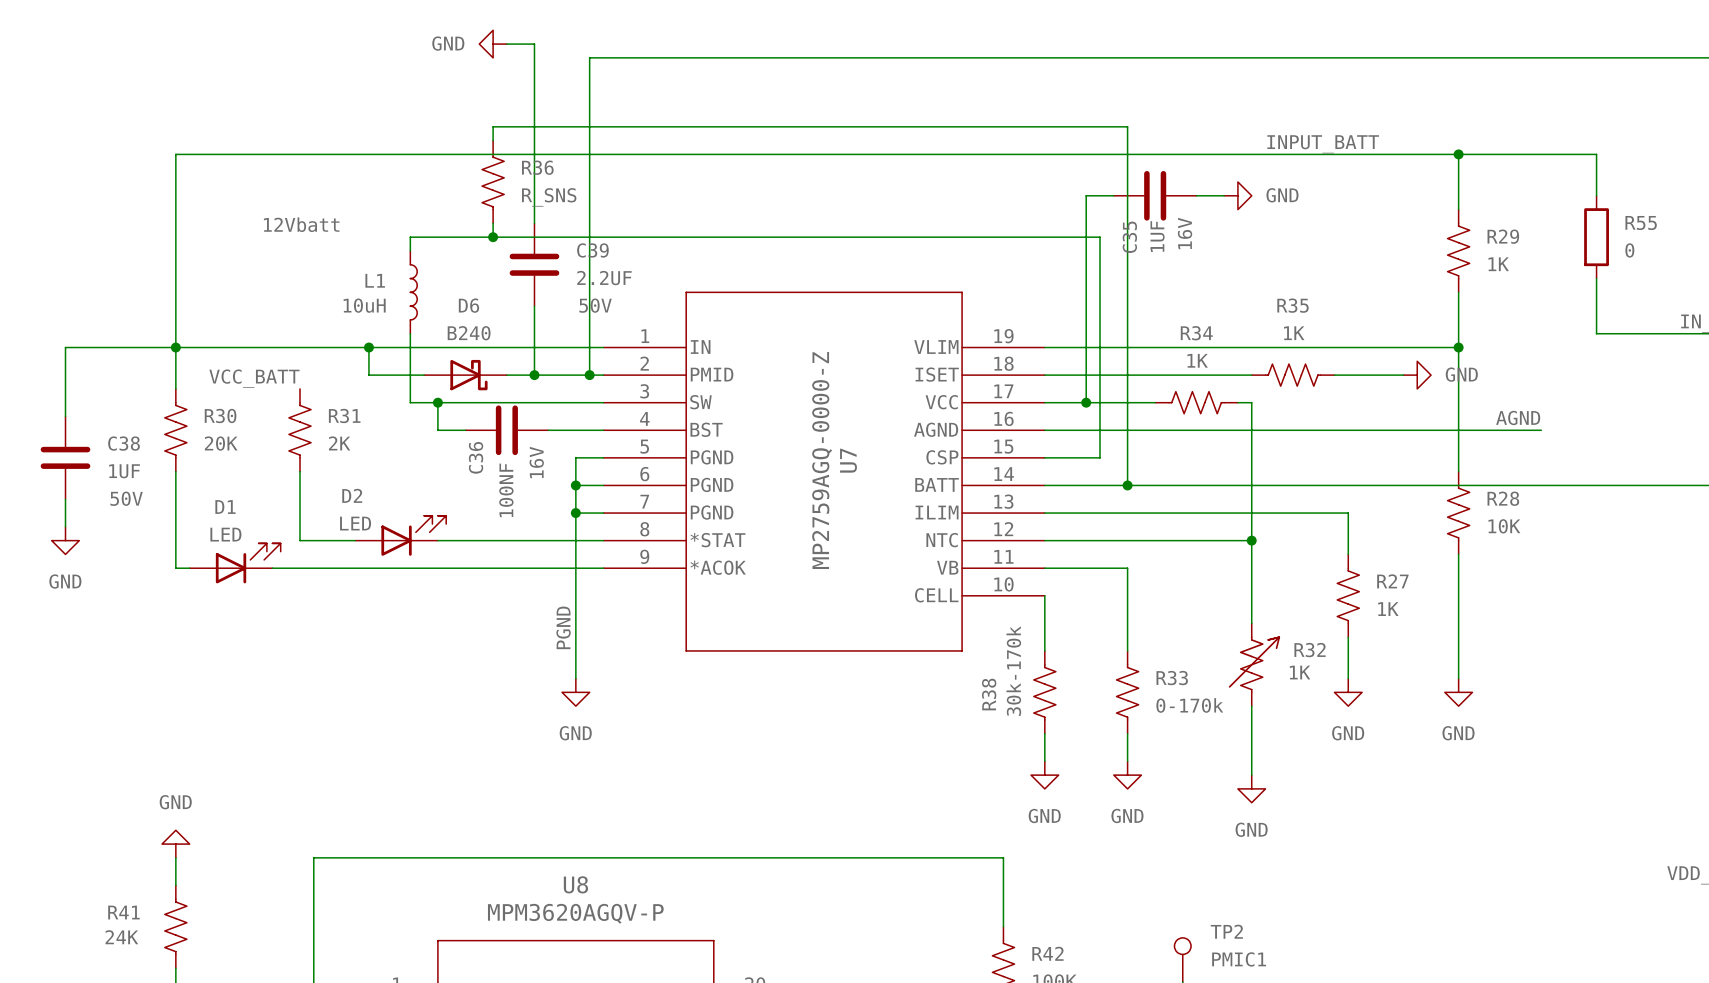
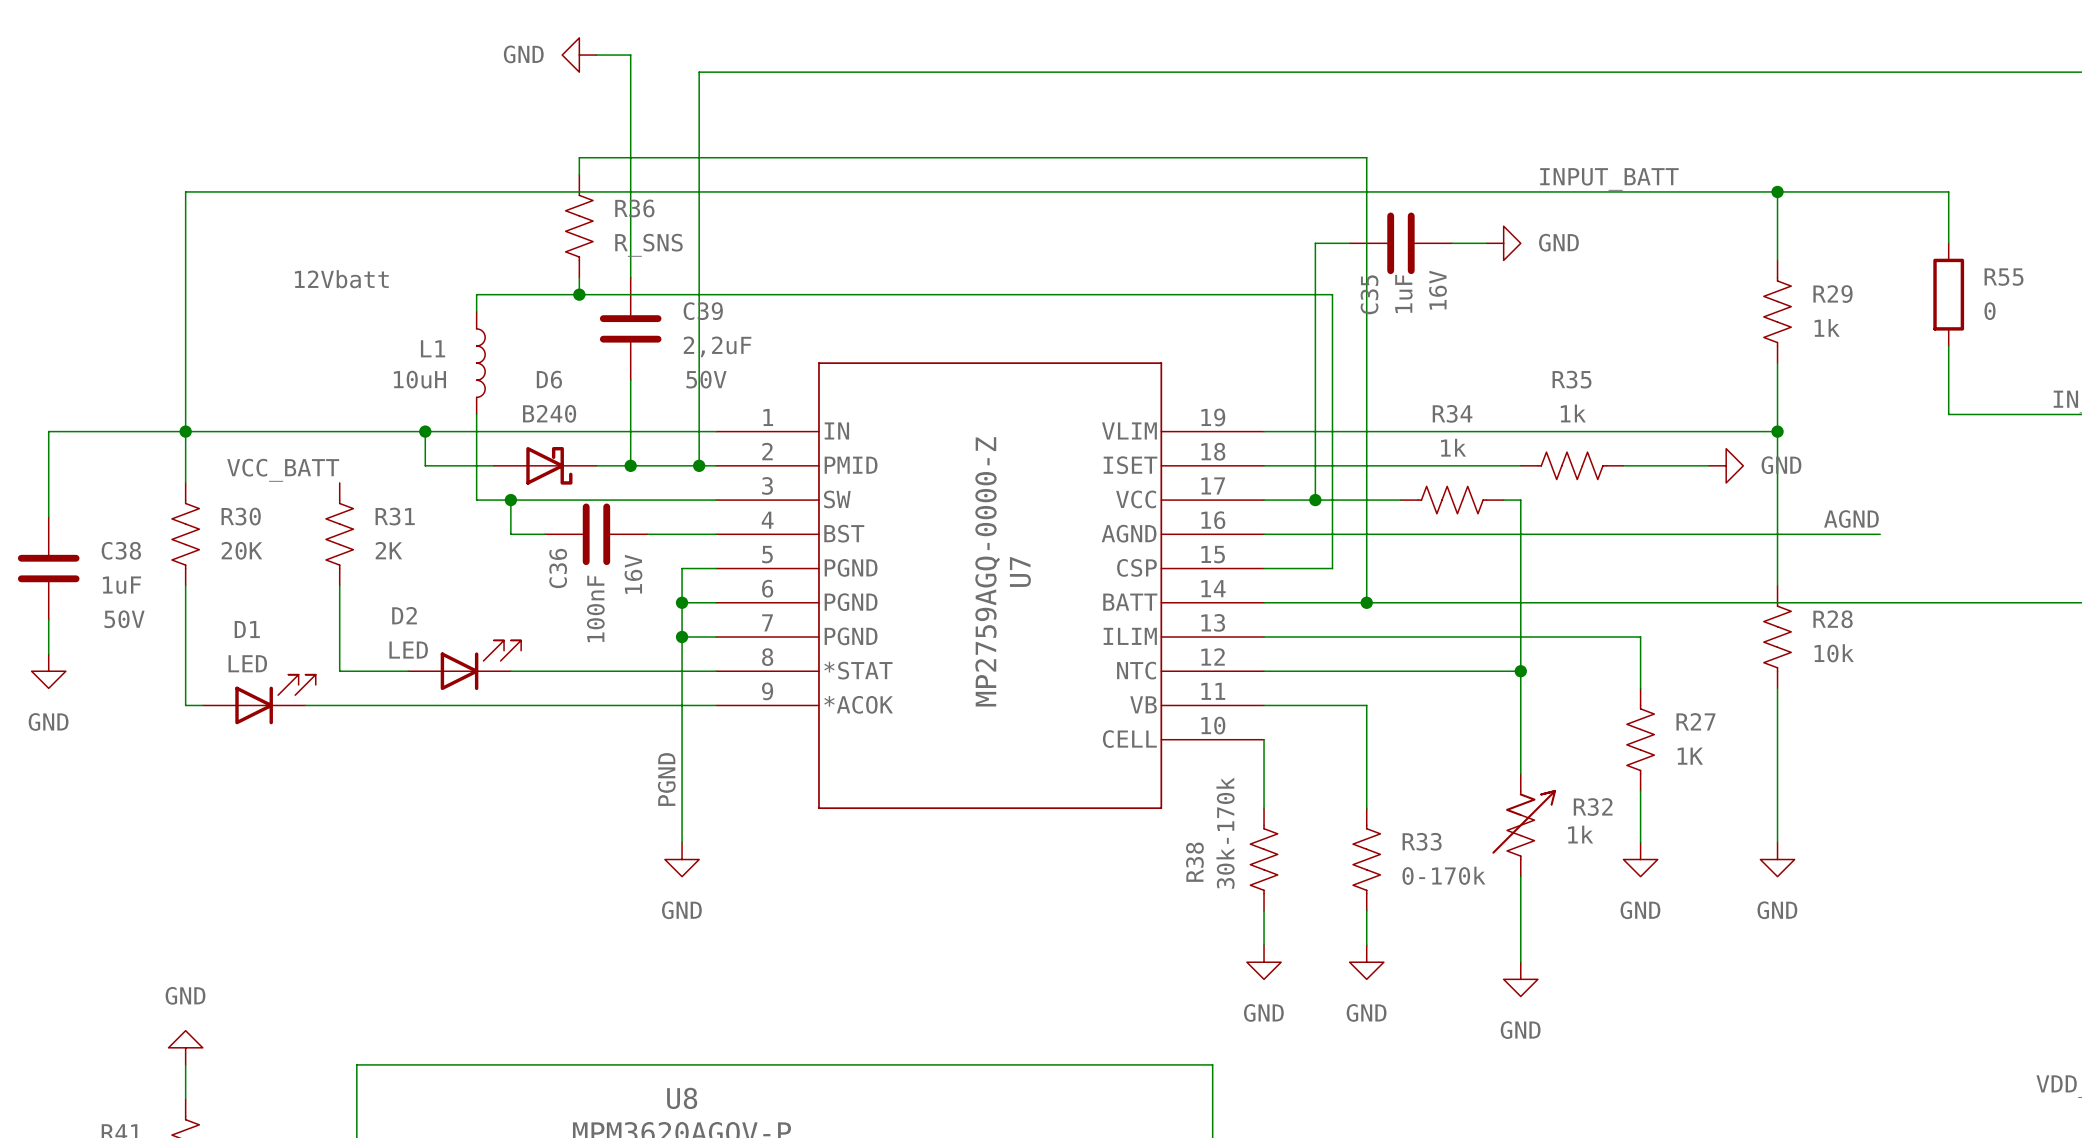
C35 value: 1UF (1157, 236) -> 1uF (1403, 293)
R29 value: 1K (1498, 264) -> 1k (1827, 327)
C39 value: 2.2UF (604, 278) -> 2,2uF (717, 346)
R35 value: 1K (1294, 333) -> 1k (1573, 413)
R34 value: 1K (1197, 360) -> 1k (1453, 447)
C38 value: 1UF (124, 471) -> 1uF (121, 585)
C36 value: 100NF (506, 490) -> 100nF (595, 608)
R28 value: 10K (1504, 526) -> 10k (1834, 653)
R32 value: 1K (1300, 672) -> 1k (1580, 834)

